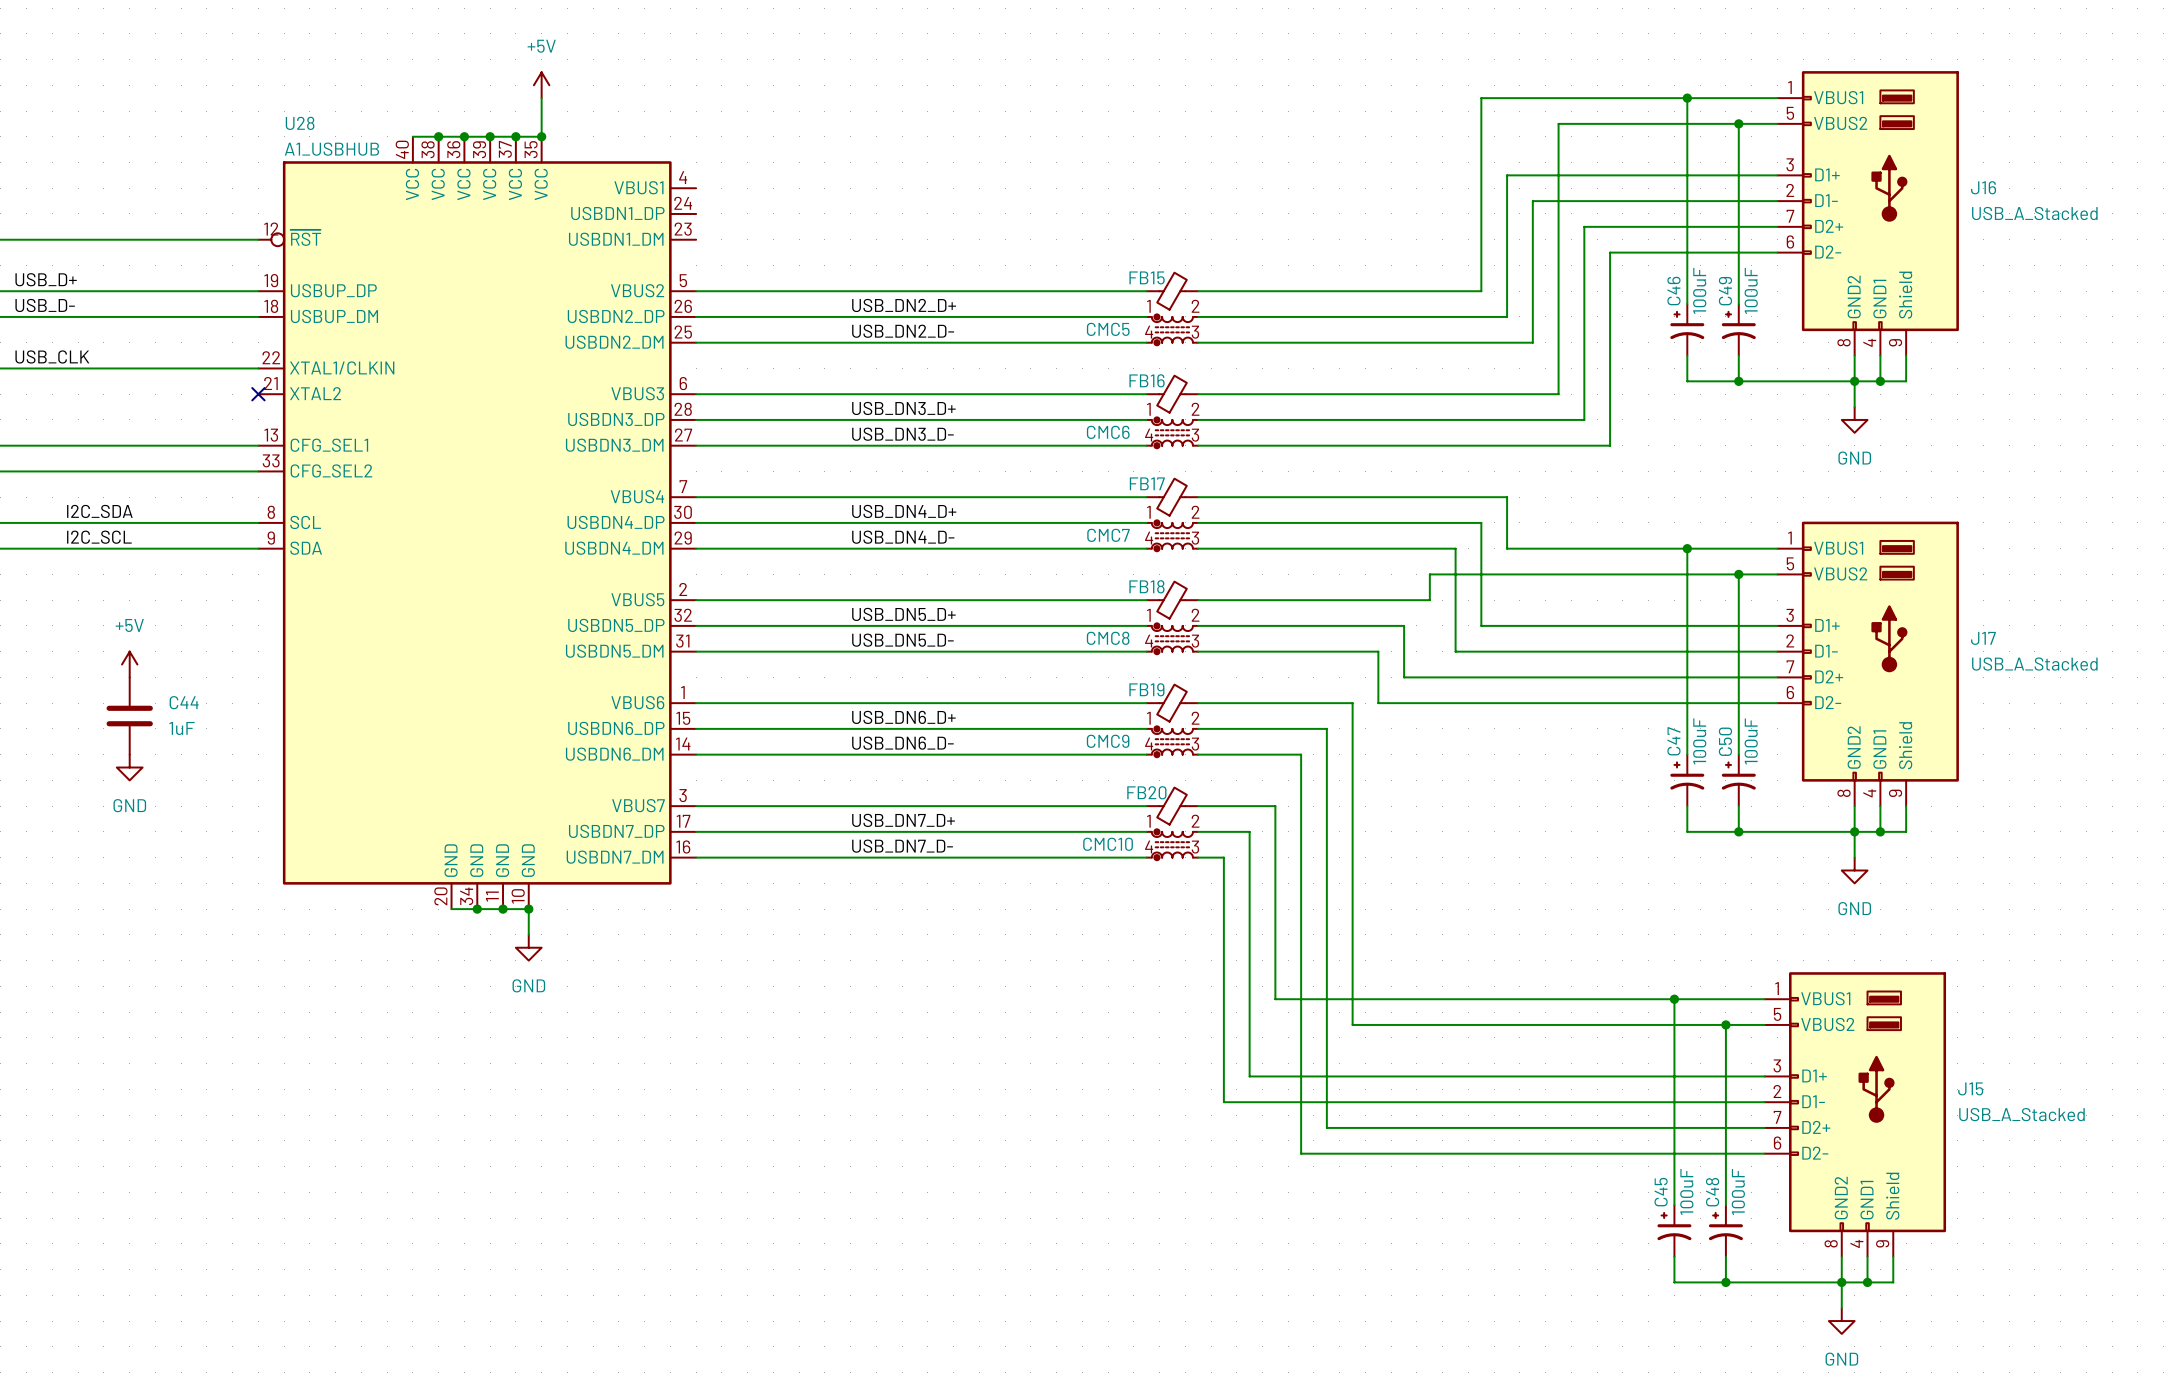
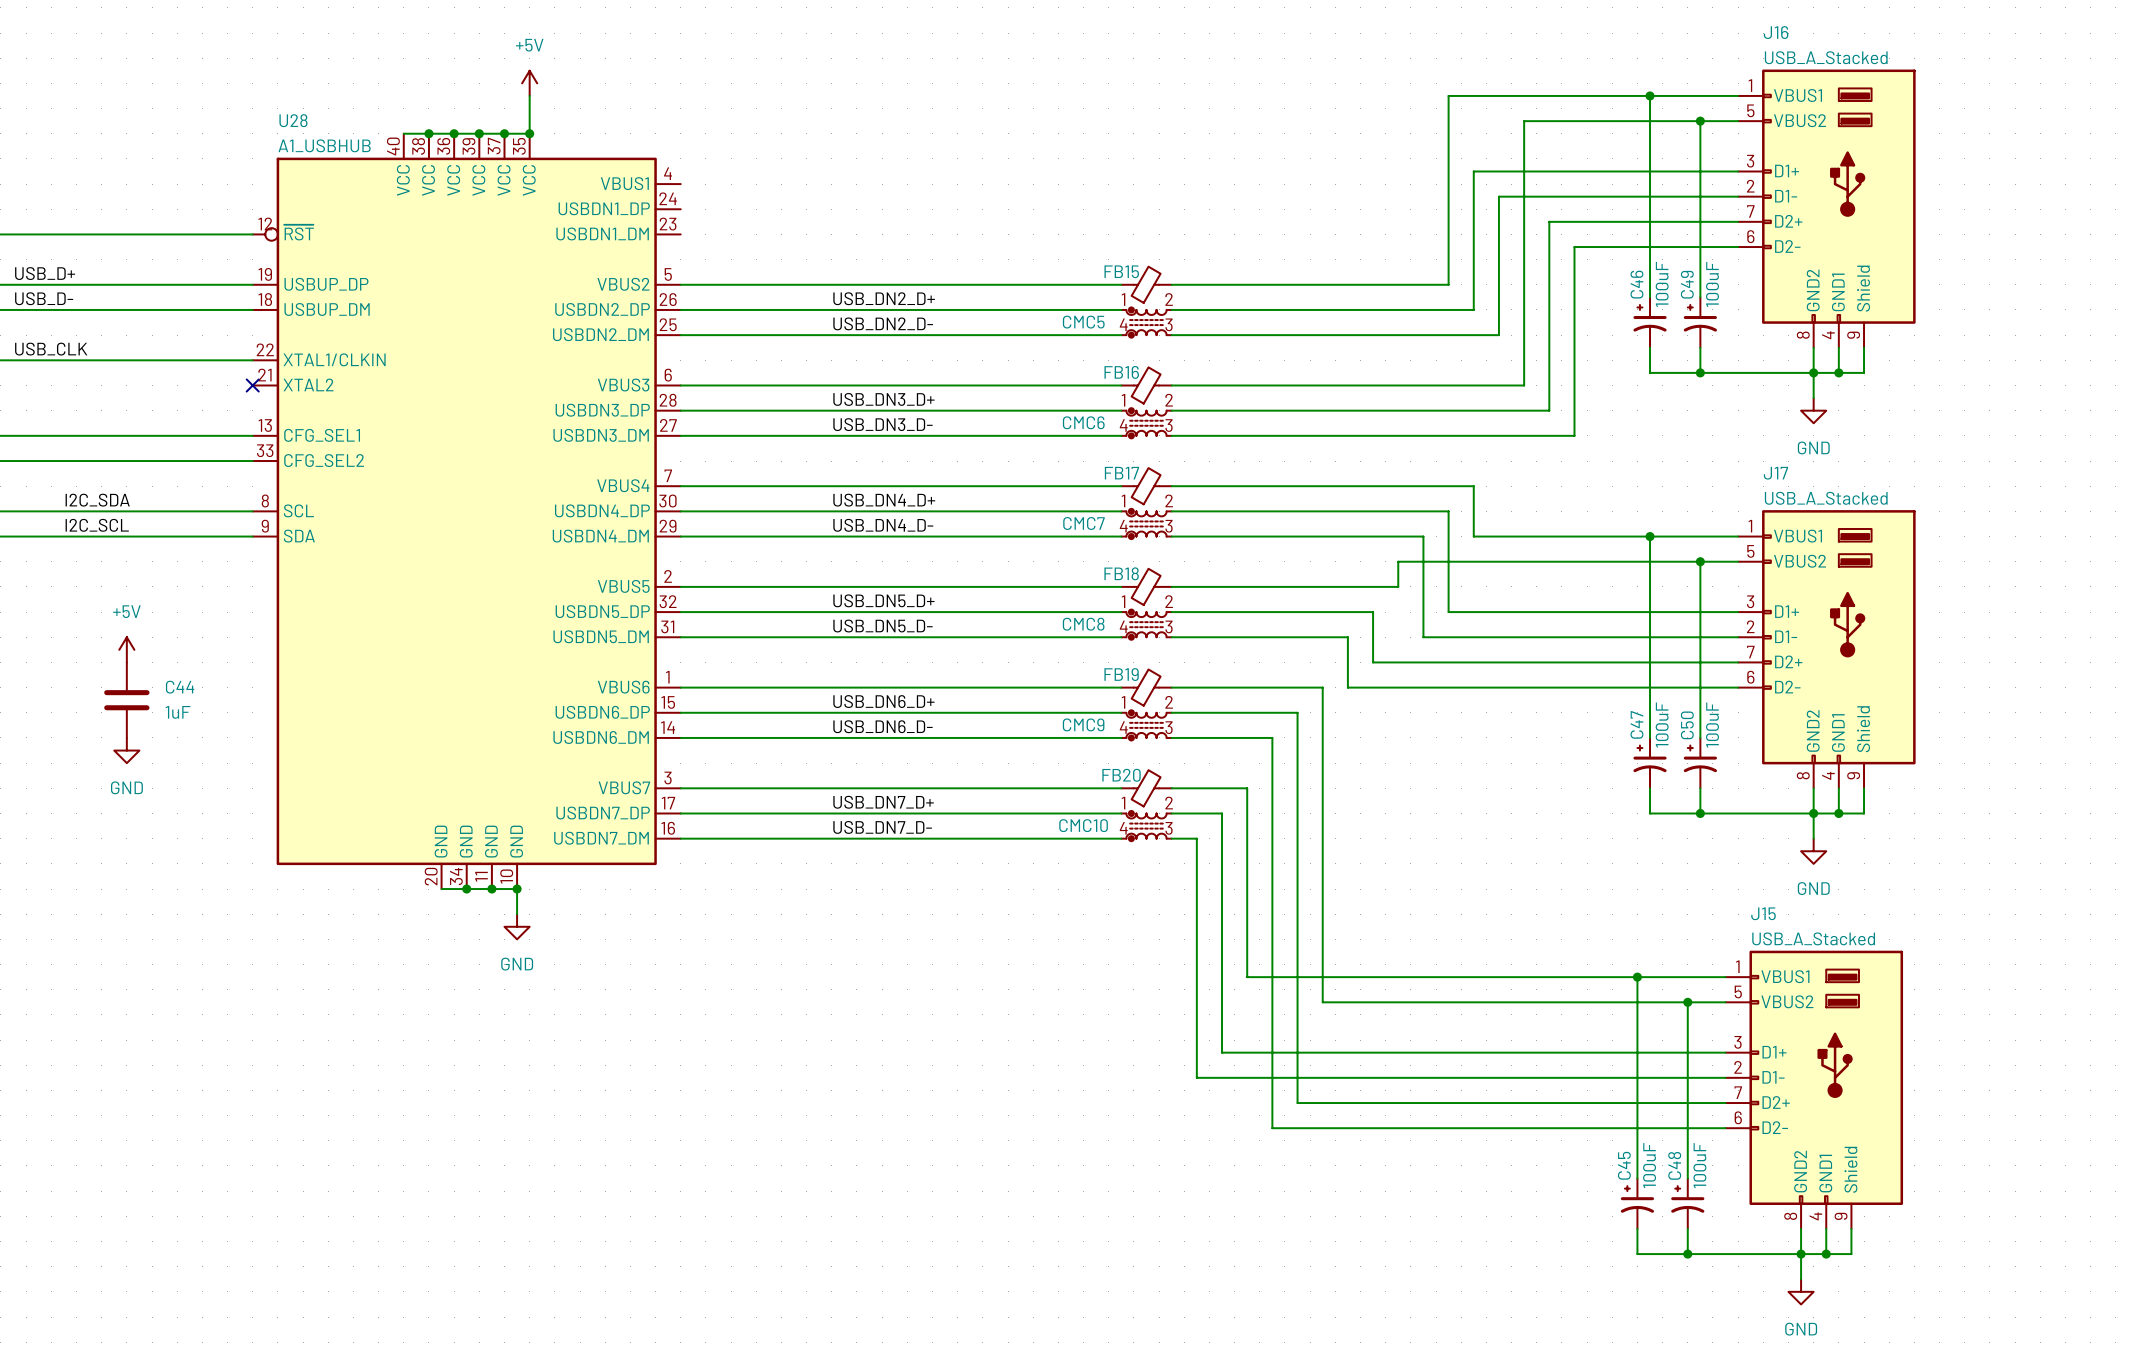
J16 name position: J16 (1983, 187) -> J16 (1776, 32)
J16 value position: USB_A_Stacked (2034, 213) -> USB_A_Stacked (1826, 57)
J17 name position: J17 (1983, 638) -> J17 (1775, 473)
J17 value position: USB_A_Stacked (2034, 664) -> USB_A_Stacked (1826, 498)
J15 name position: J15 (1970, 1088) -> J15 (1763, 913)
J15 value position: USB_A_Stacked (2021, 1114) -> USB_A_Stacked (1813, 938)

